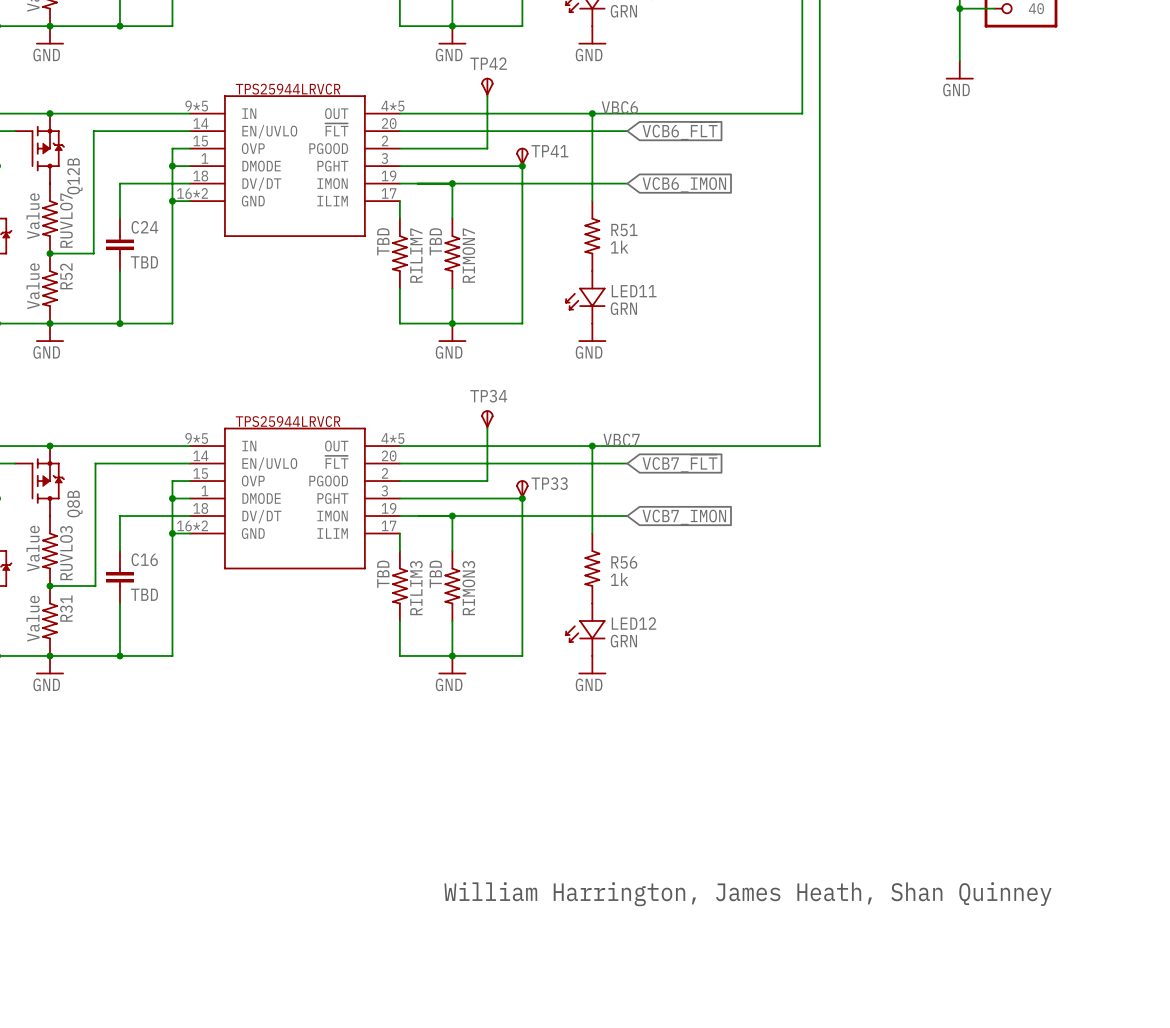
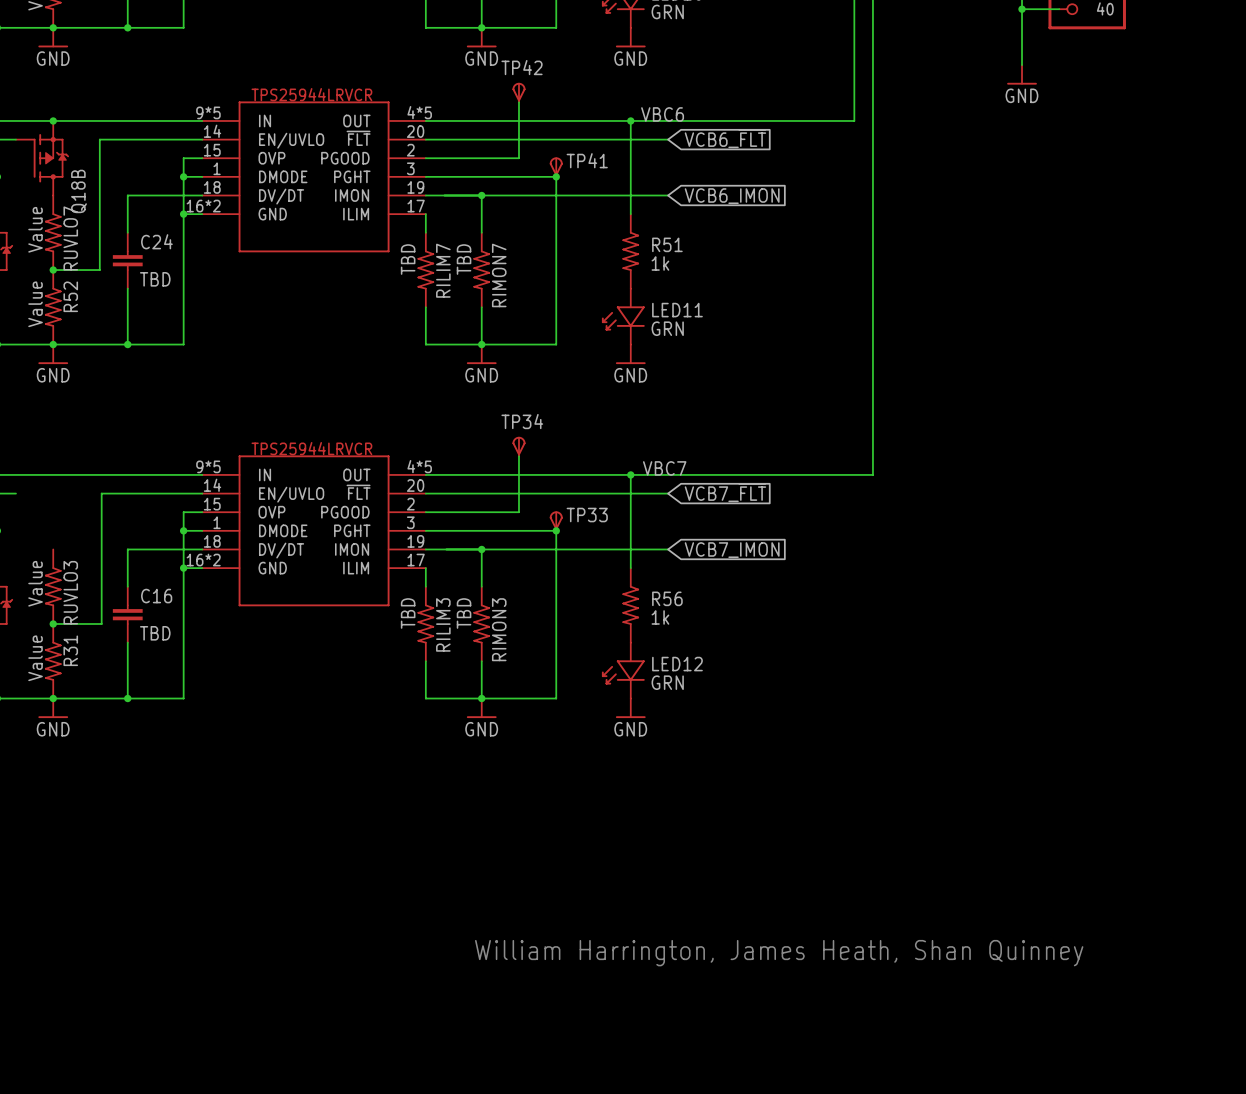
Q12B name: Q12B (74, 176) -> Q18B (79, 191)
junction: (50, 446) -> none
Q8B: (39, 481) -> none

